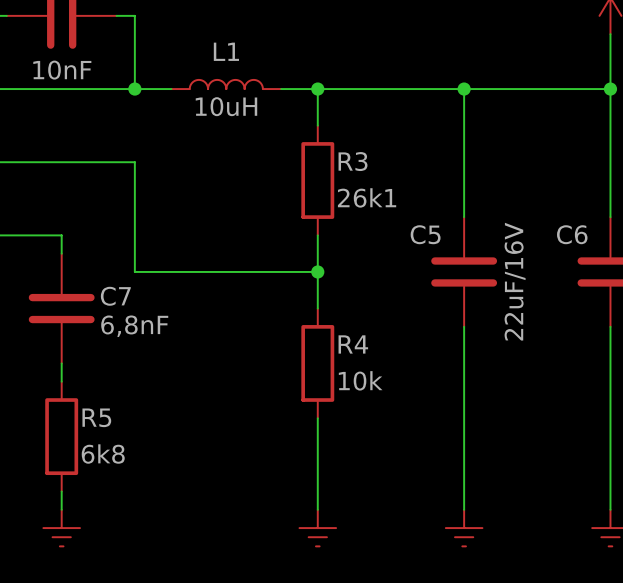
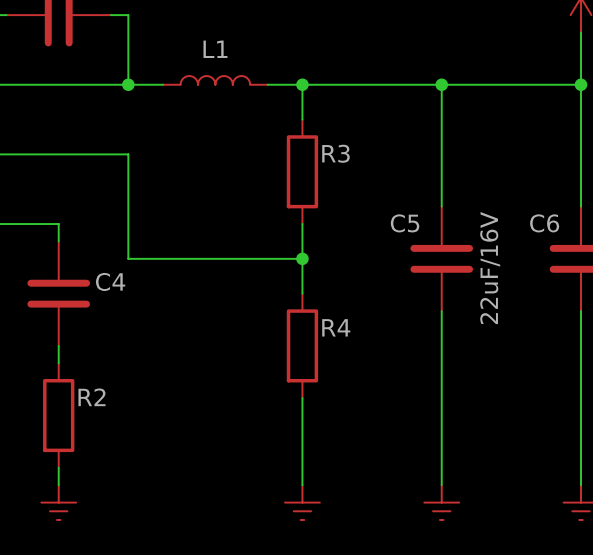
part value: 10nF (62, 70) -> none
L1 value: 10uH (226, 106) -> none
R3 value: 26k1 (367, 197) -> none
C7 name: C7 (115, 296) -> C4 (110, 281)
C7 value: 6,8nF (134, 326) -> none
R4 value: 10k (360, 380) -> none
R5 name: R5 (96, 417) -> R2 (91, 397)
R5 value: 6k8 (103, 454) -> none

